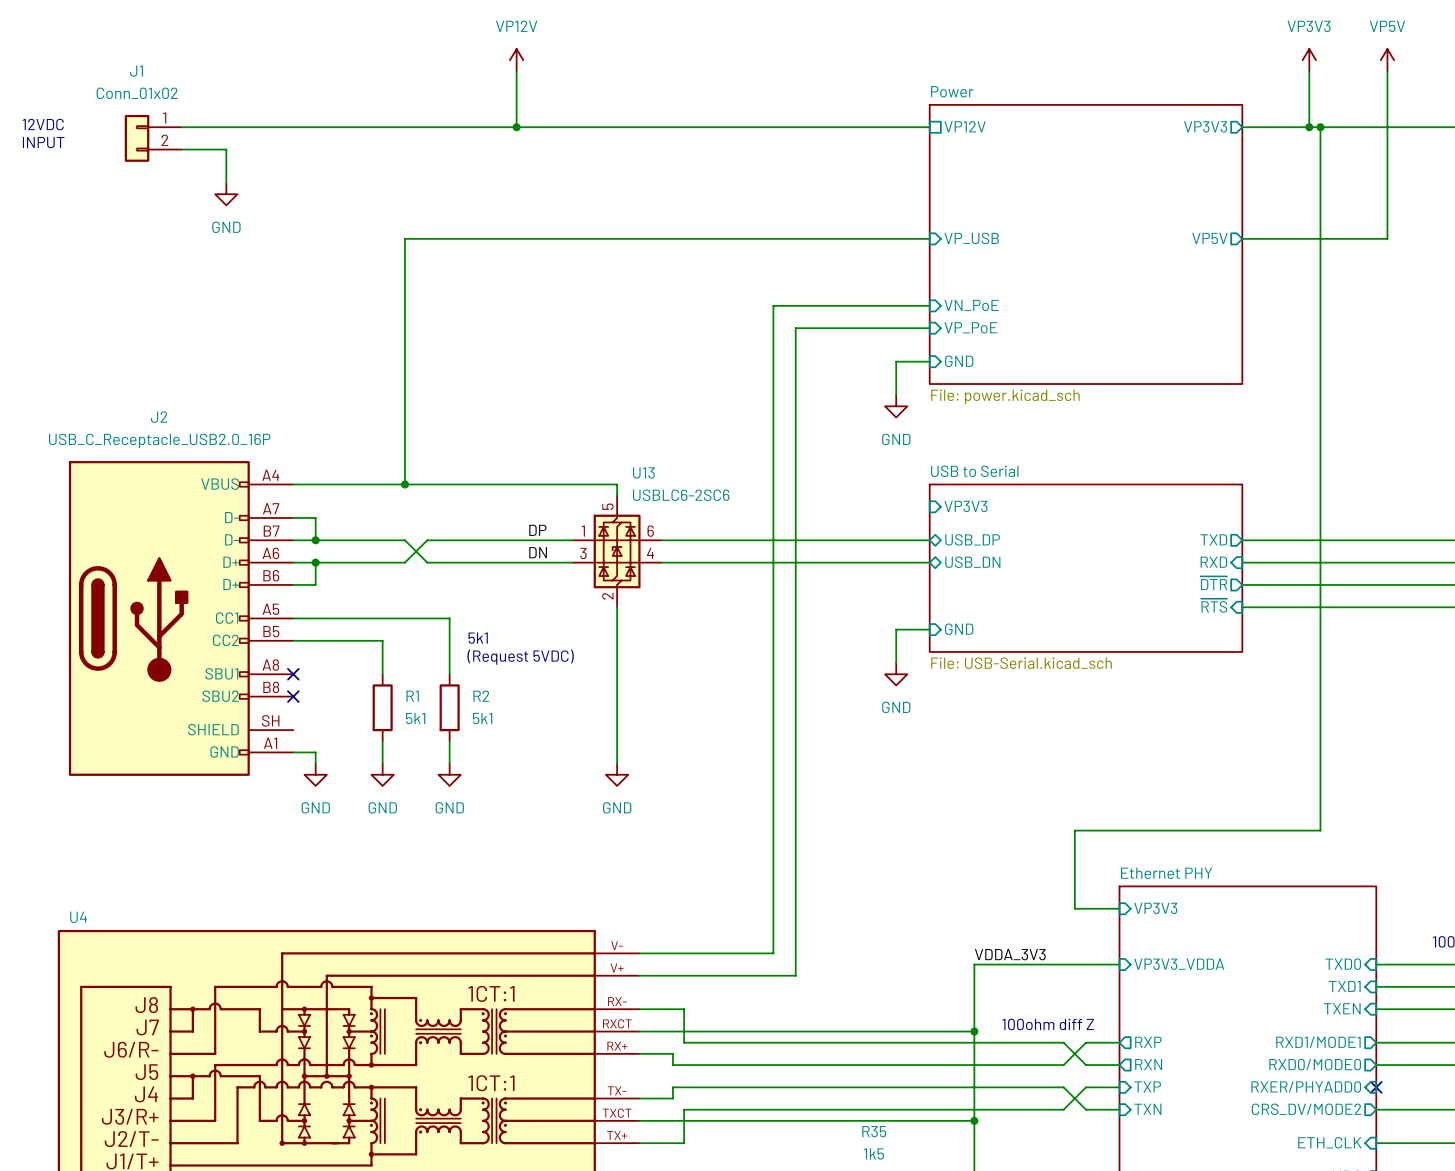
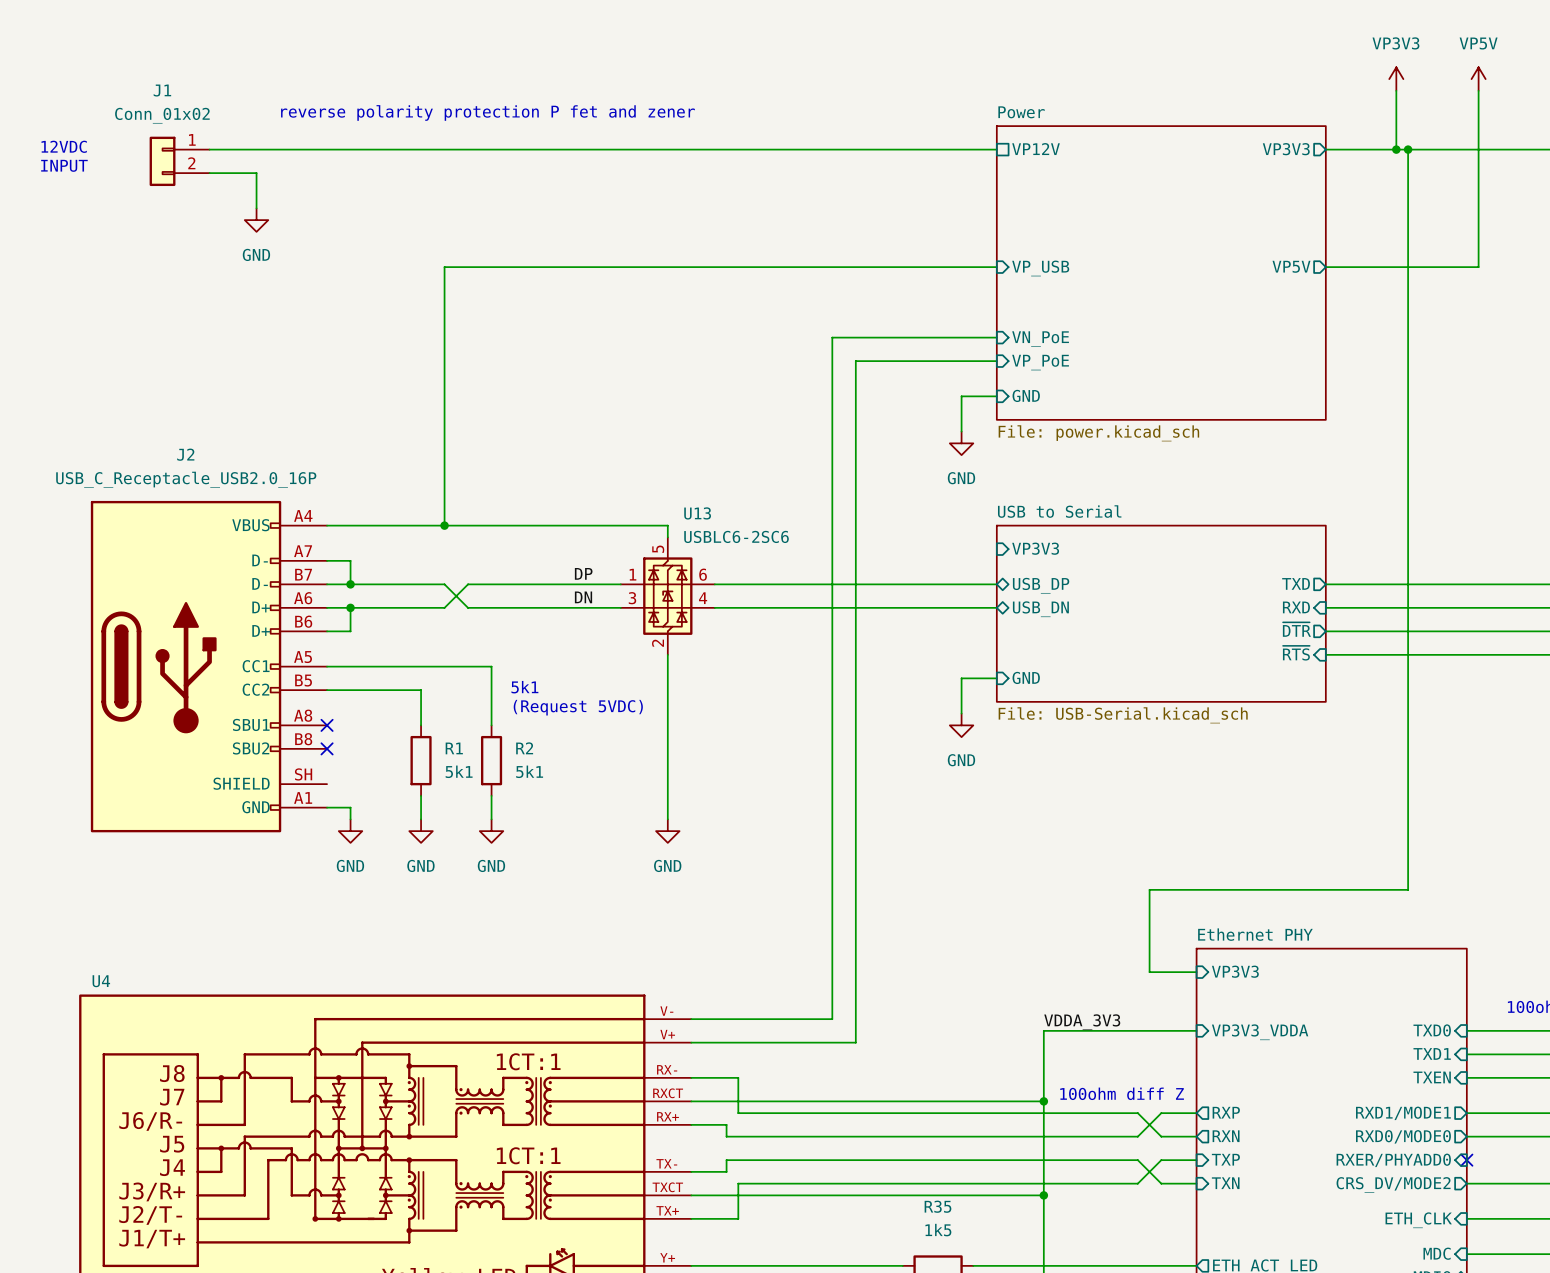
power symbol: VP12V (516, 60) -> none
wire: (516, 71) (516, 127) -> none
text: none -> reverse polarity protection P fet and zener (487, 112)
junction: (516, 127) -> none

